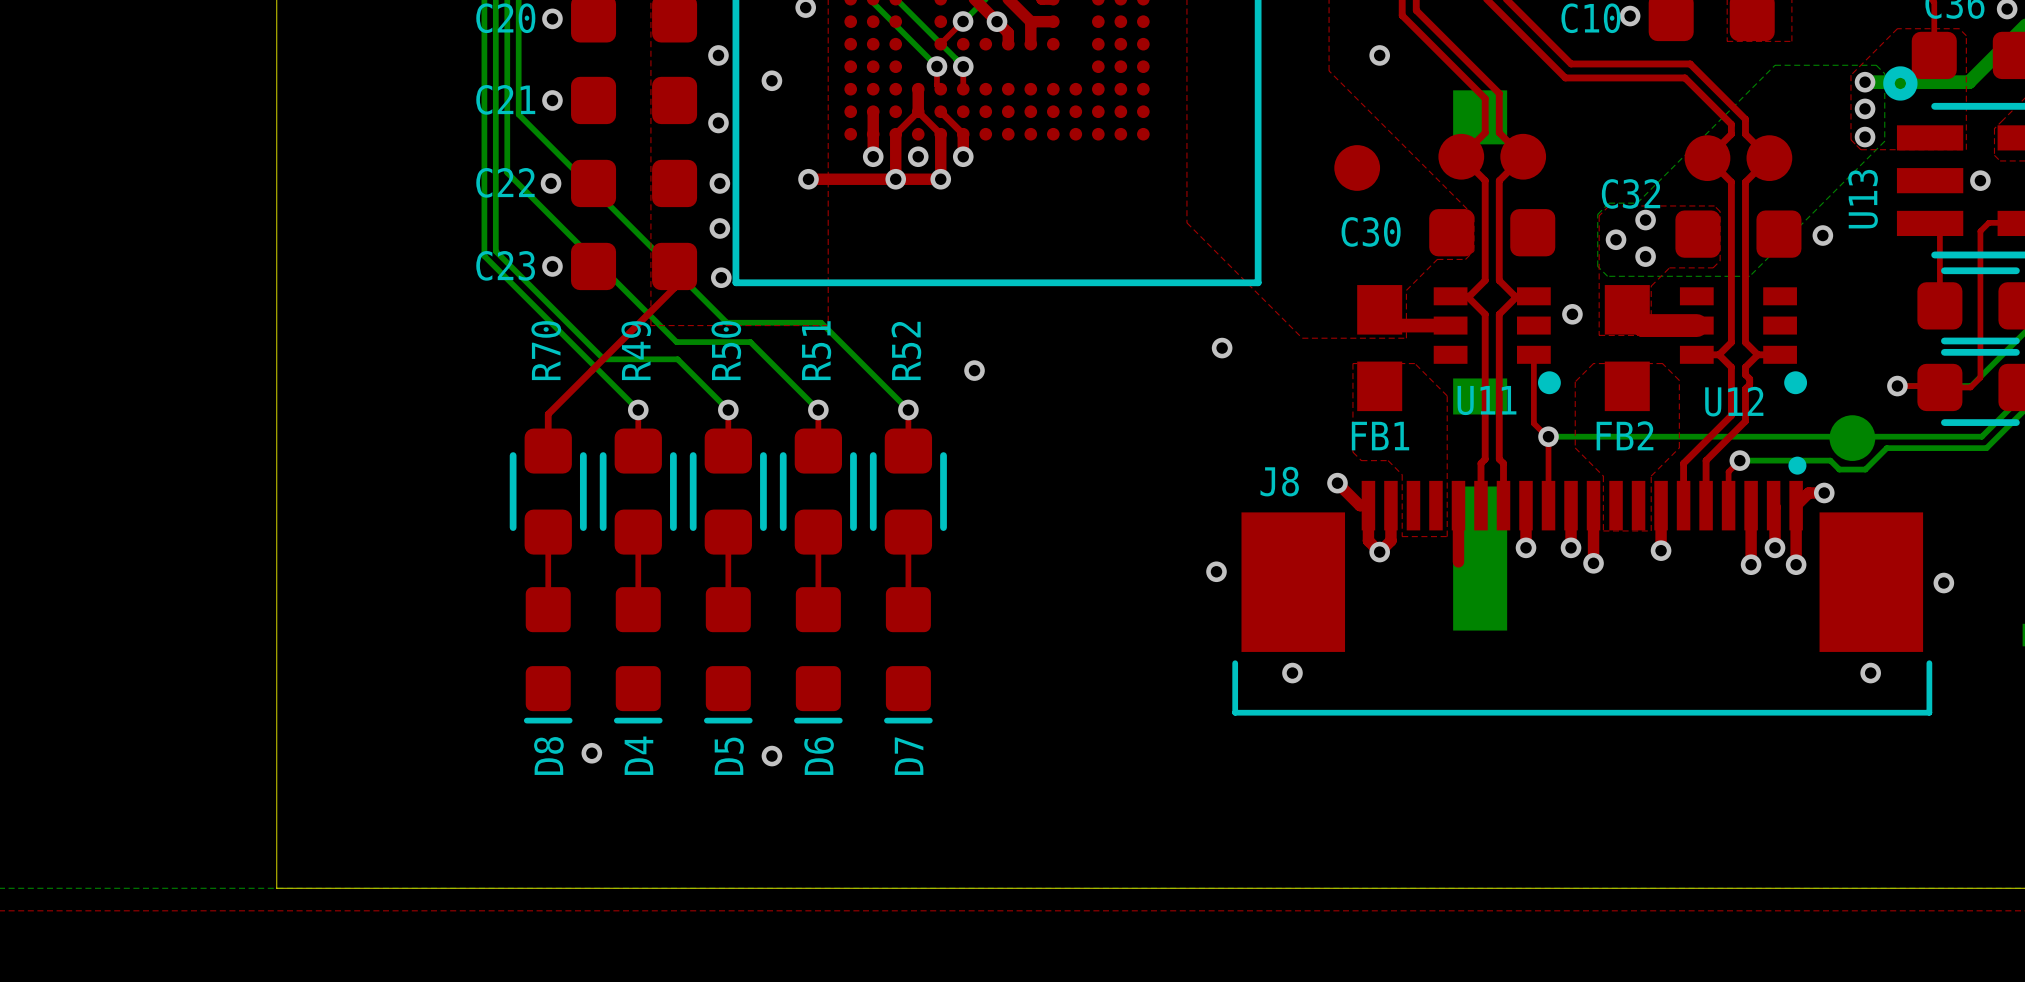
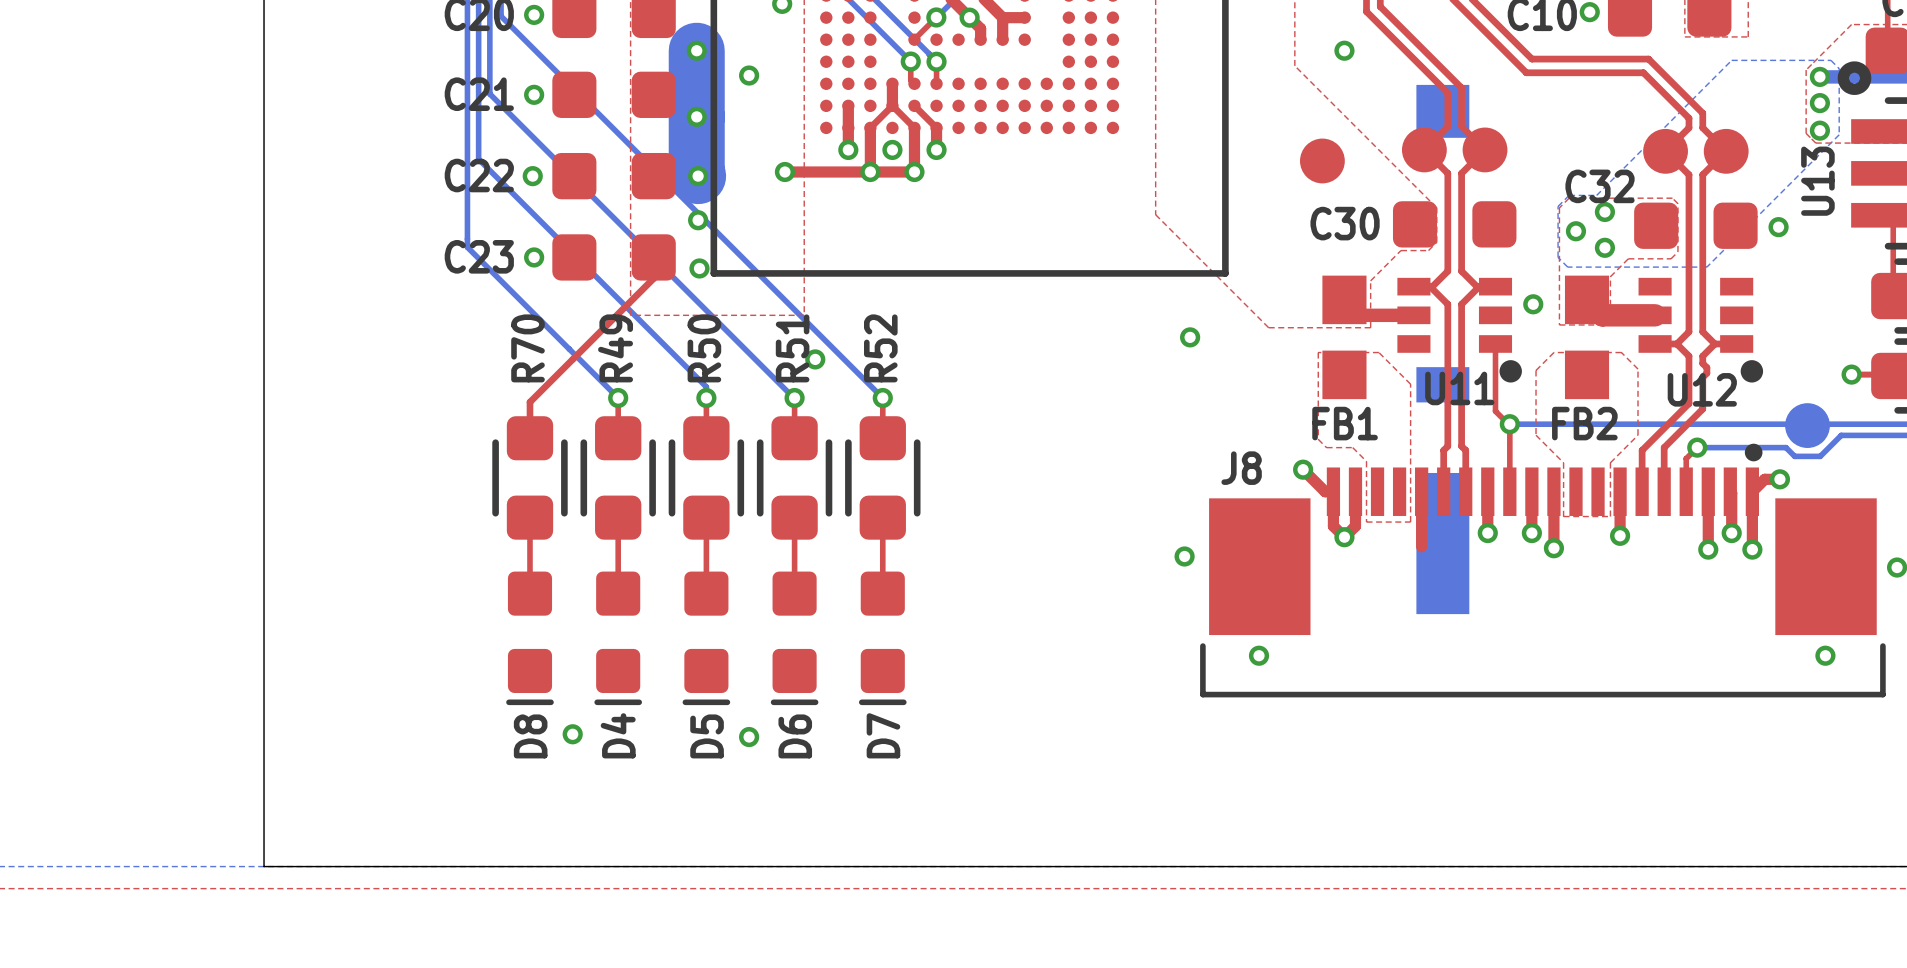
bottom track: (518, 20) (518, 114) (726, 322) (821, 322) -> (501, 16) (797, 312)
bottom track: none -> (696, 50) (698, 176)
bottom track: (507, 99) (507, 172) (676, 342) (750, 342) (818, 409) -> (489, 93) (793, 398)
bottom track: (495, 166) (495, 251) (603, 359) (677, 359) (728, 409) -> (478, 159) (706, 386) (706, 398)
via position: (974, 370) -> (815, 359)

